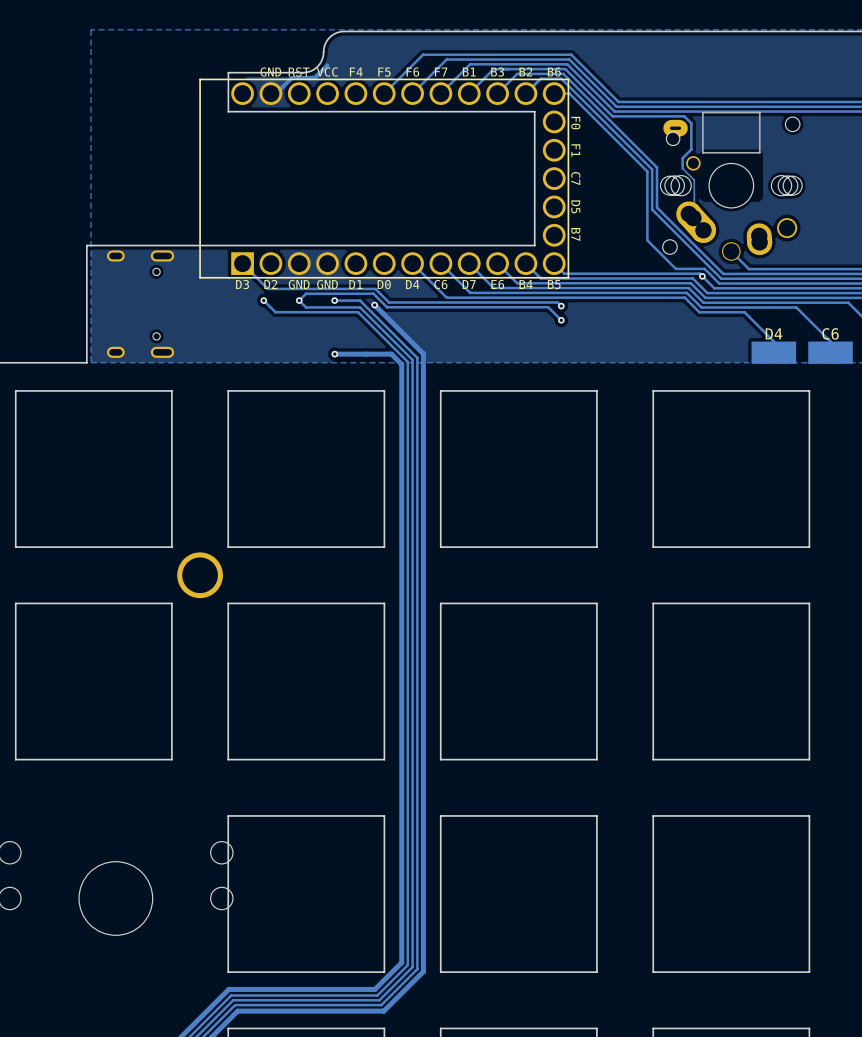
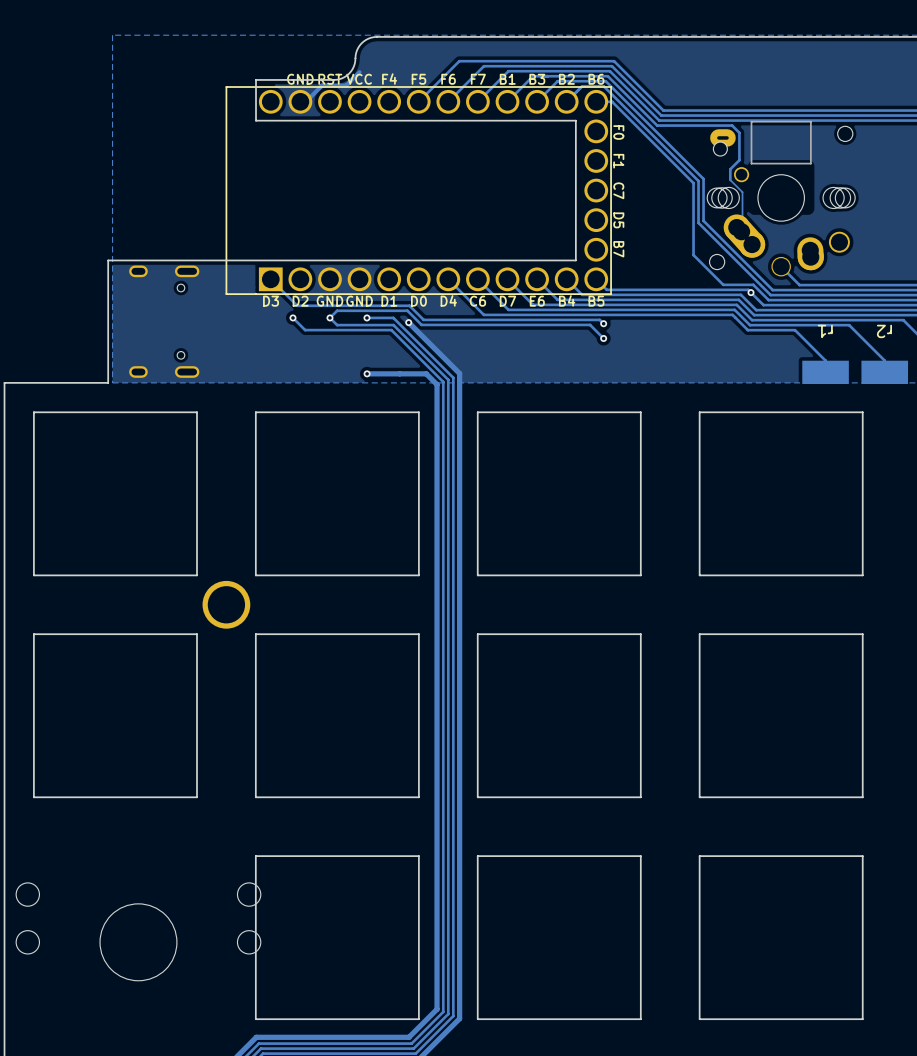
part value: D4 (773, 333) -> r1 (825, 331)
part value: C6 (830, 333) -> r2 (884, 331)

